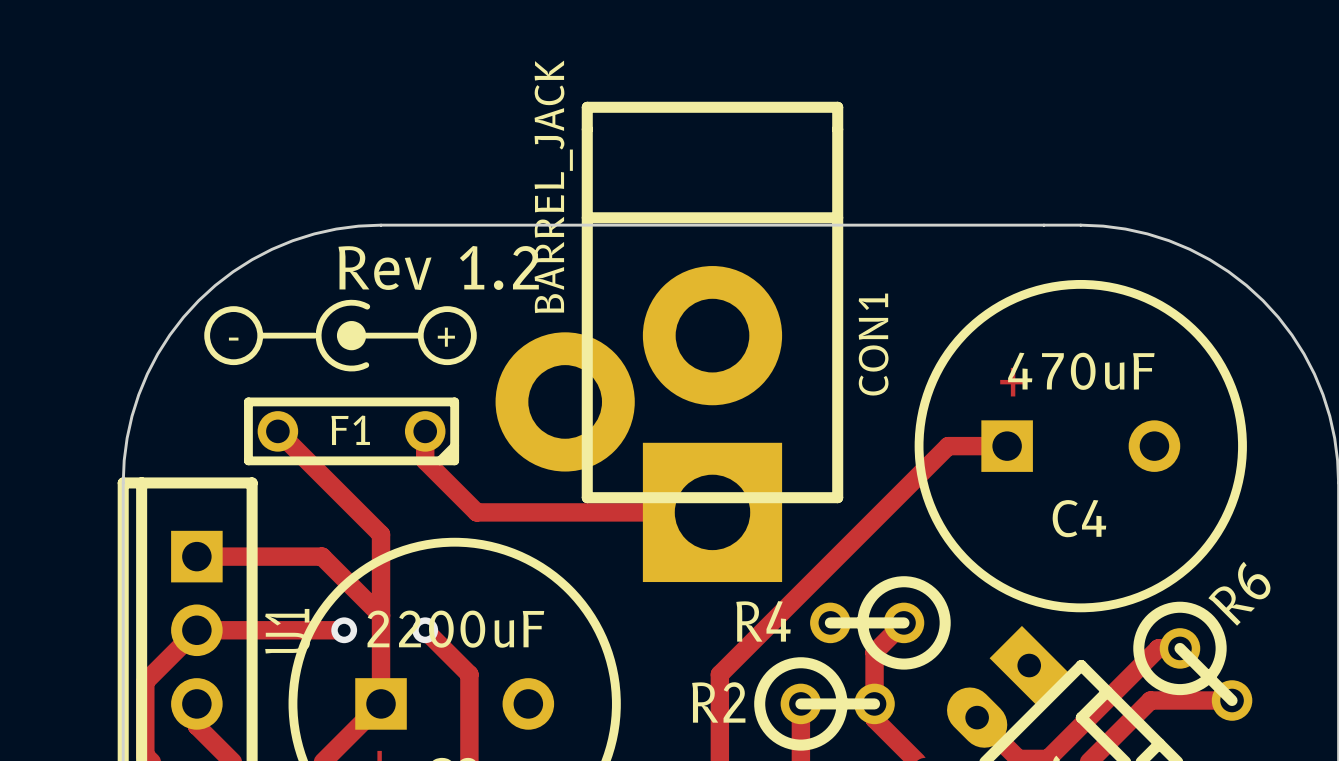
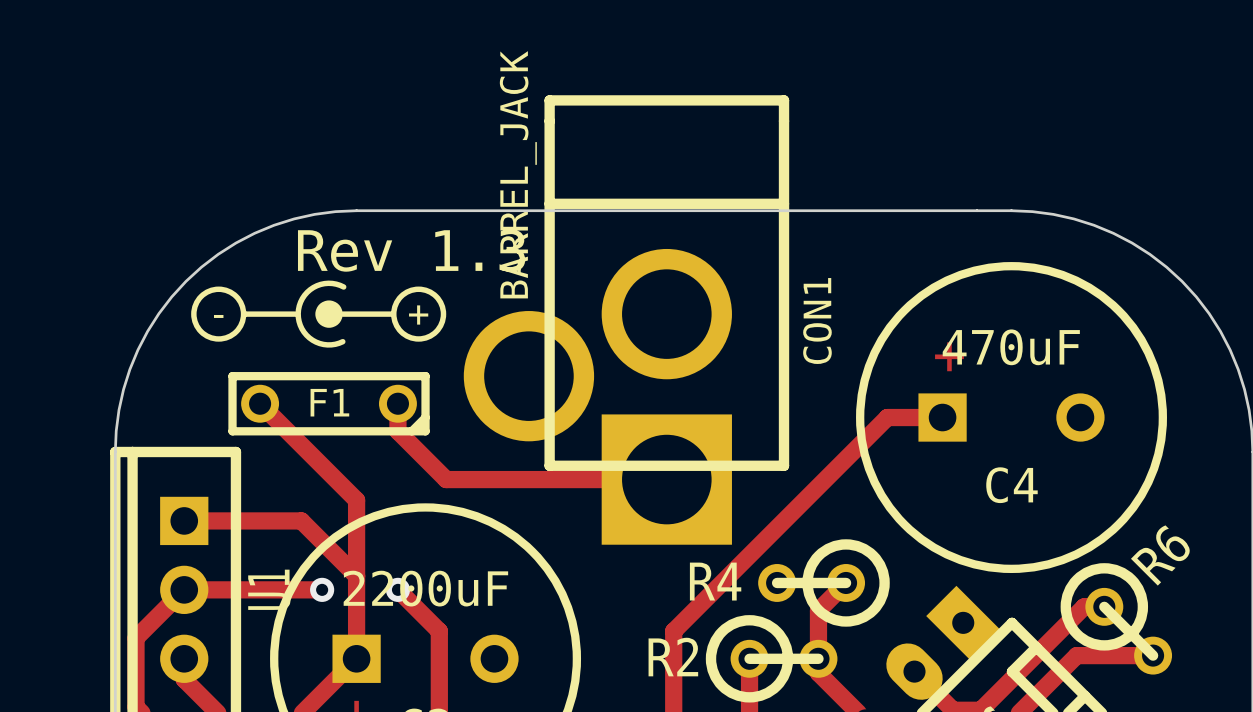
CON1 footprint: [495, 101, 844, 583] -> [463, 95, 790, 545]
text: Rev 1.2 (438, 268) -> Rev 1.3 (411, 250)

